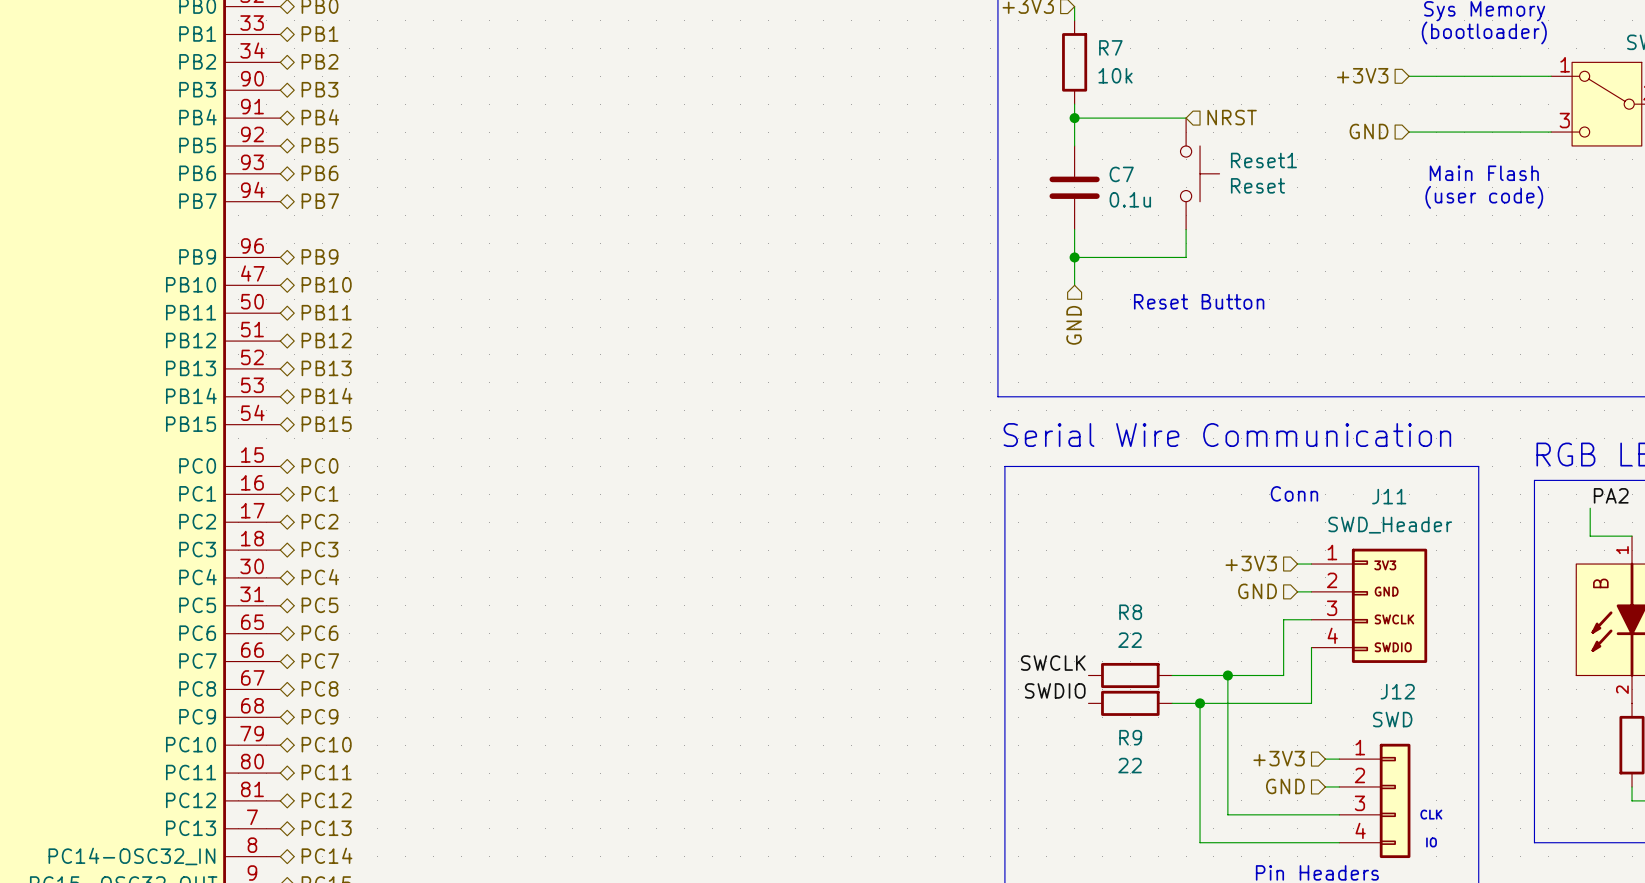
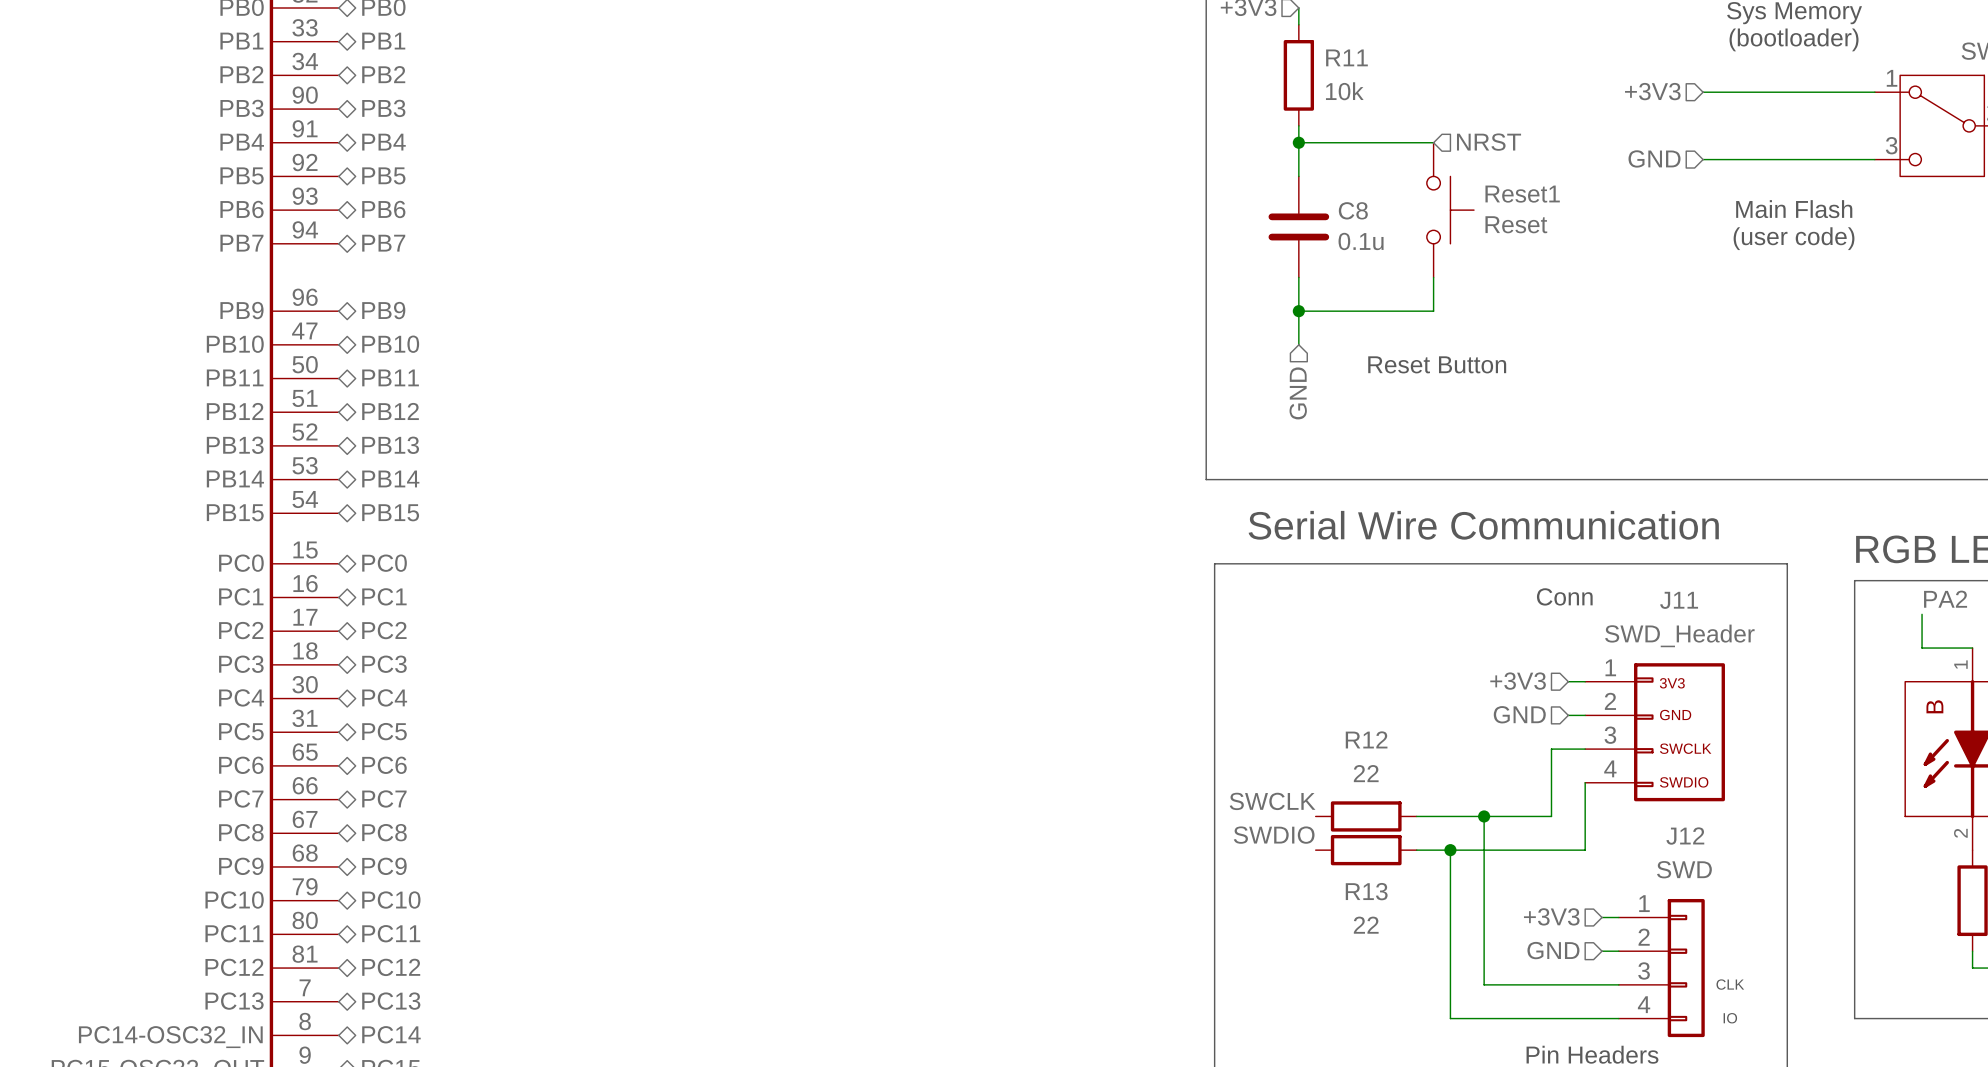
R7 name: R7 (1110, 47) -> R11 (1346, 57)
C7 name: C7 (1121, 174) -> C8 (1353, 210)
R8 name: R8 (1130, 612) -> R12 (1366, 739)
R9 name: R9 (1130, 737) -> R13 (1366, 891)

